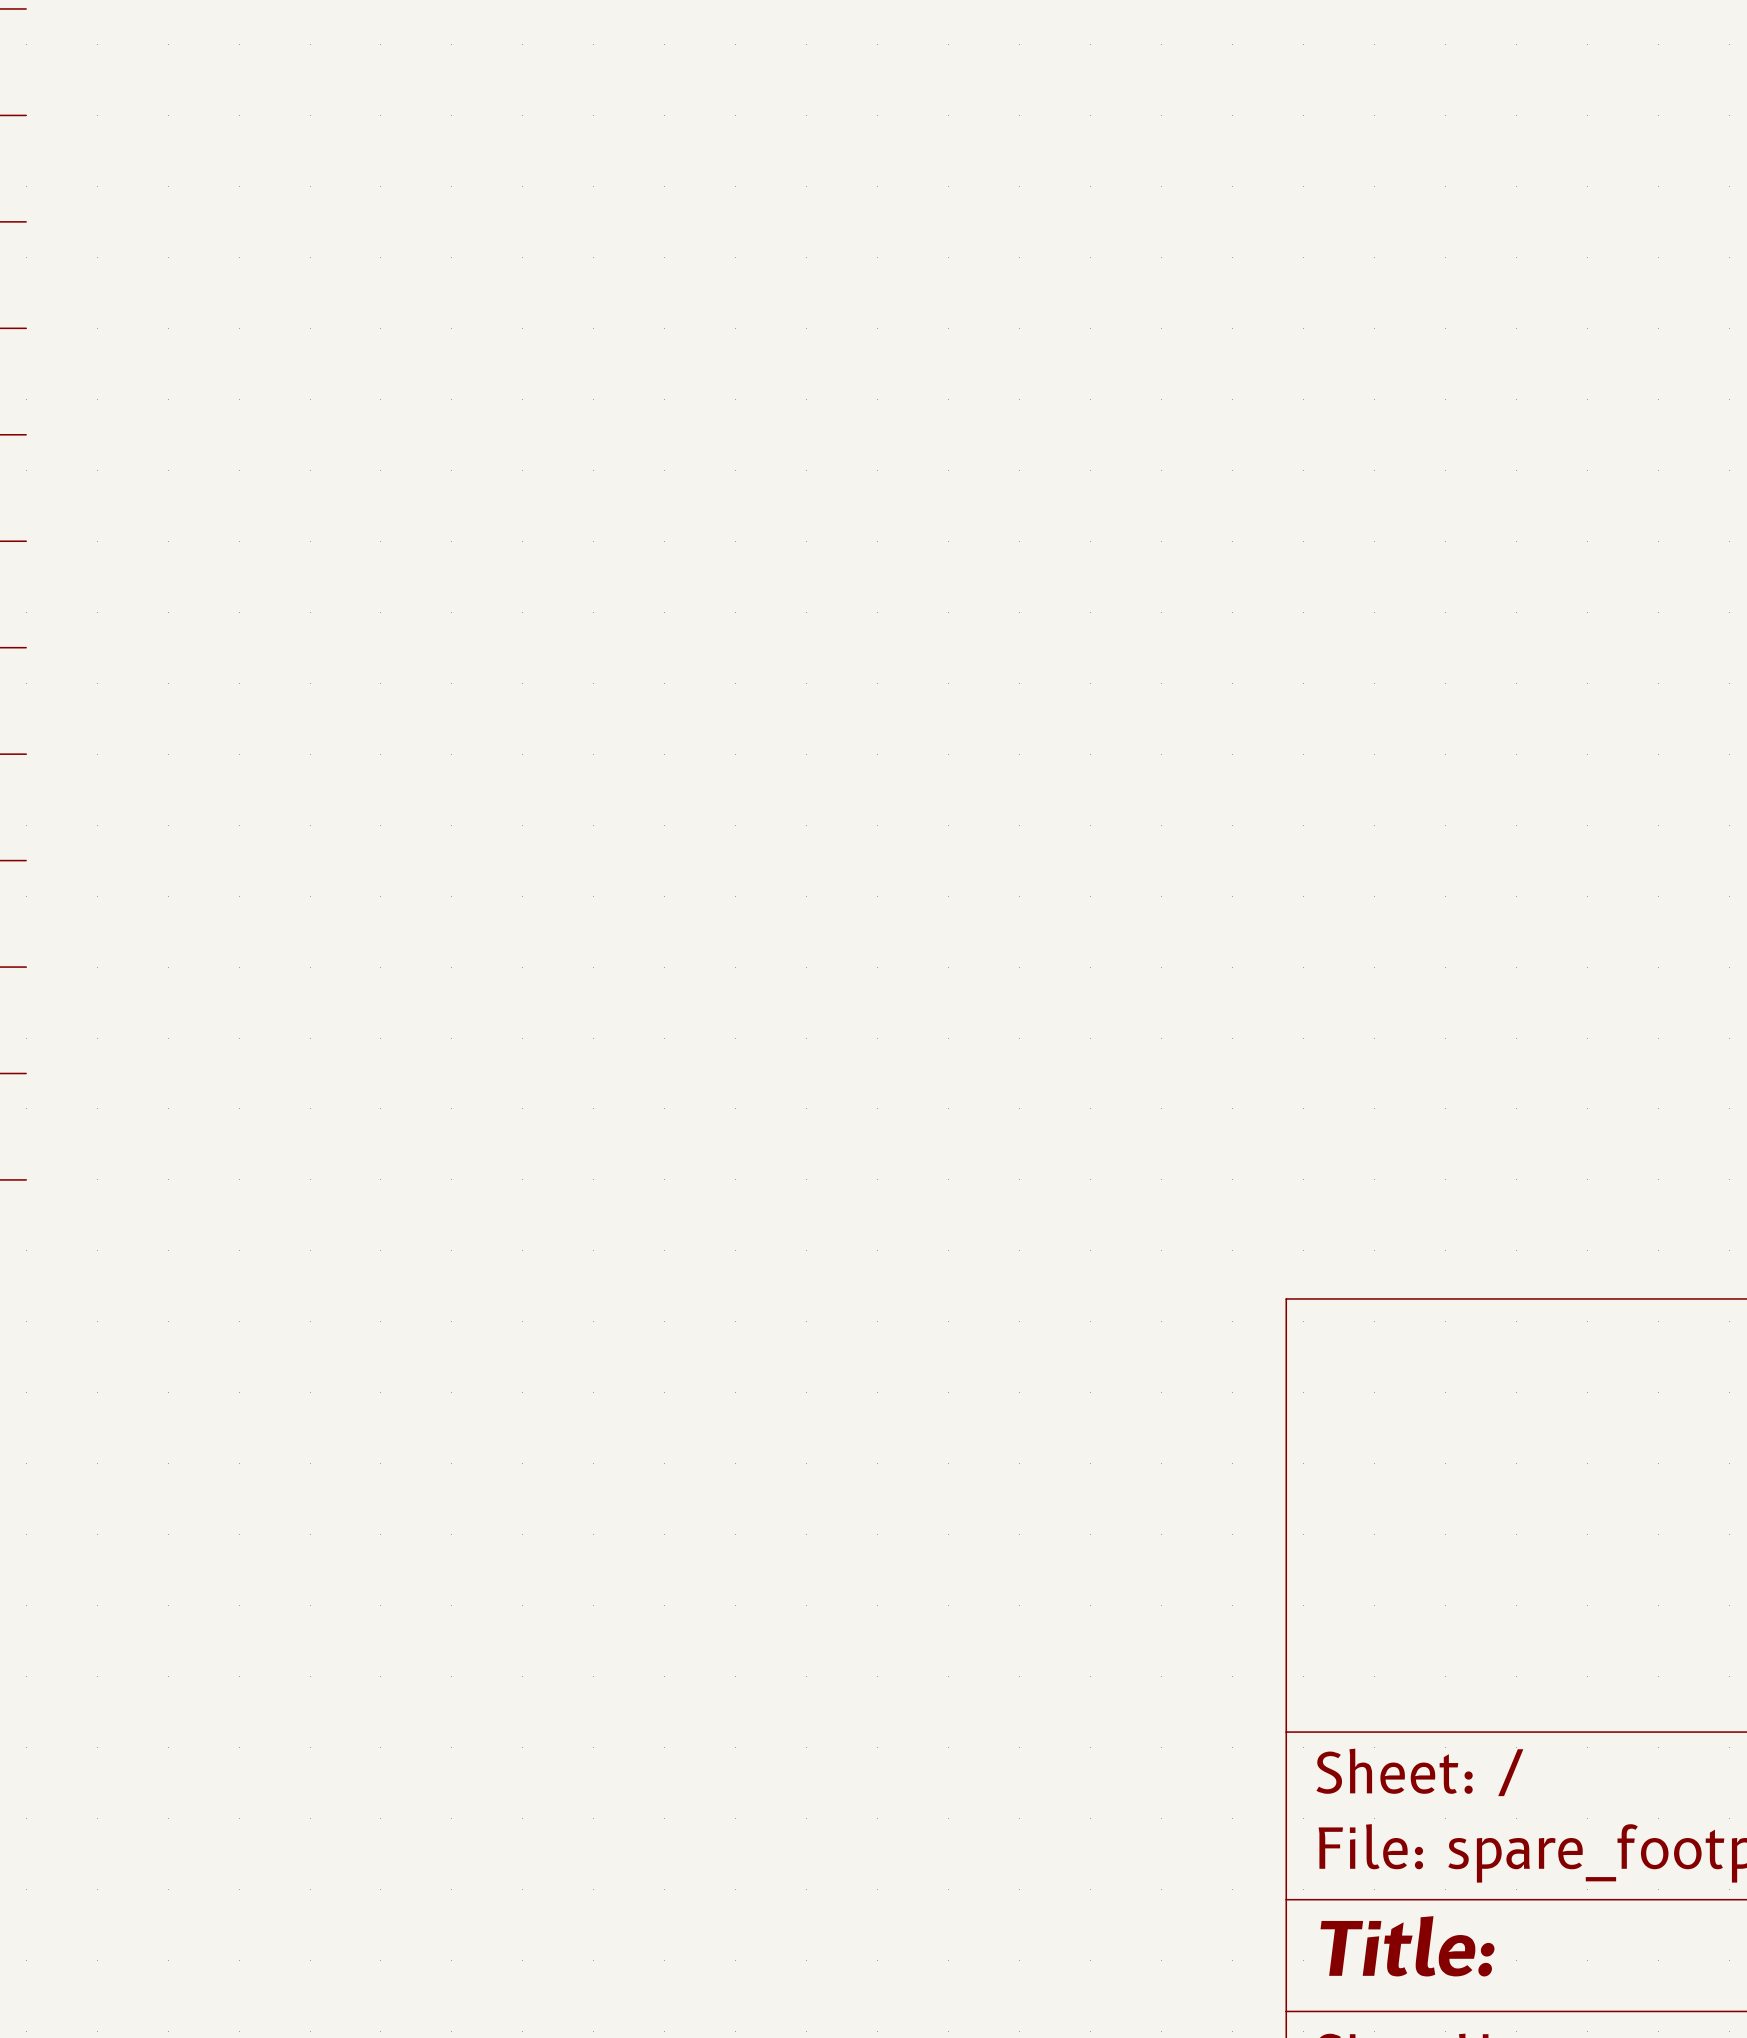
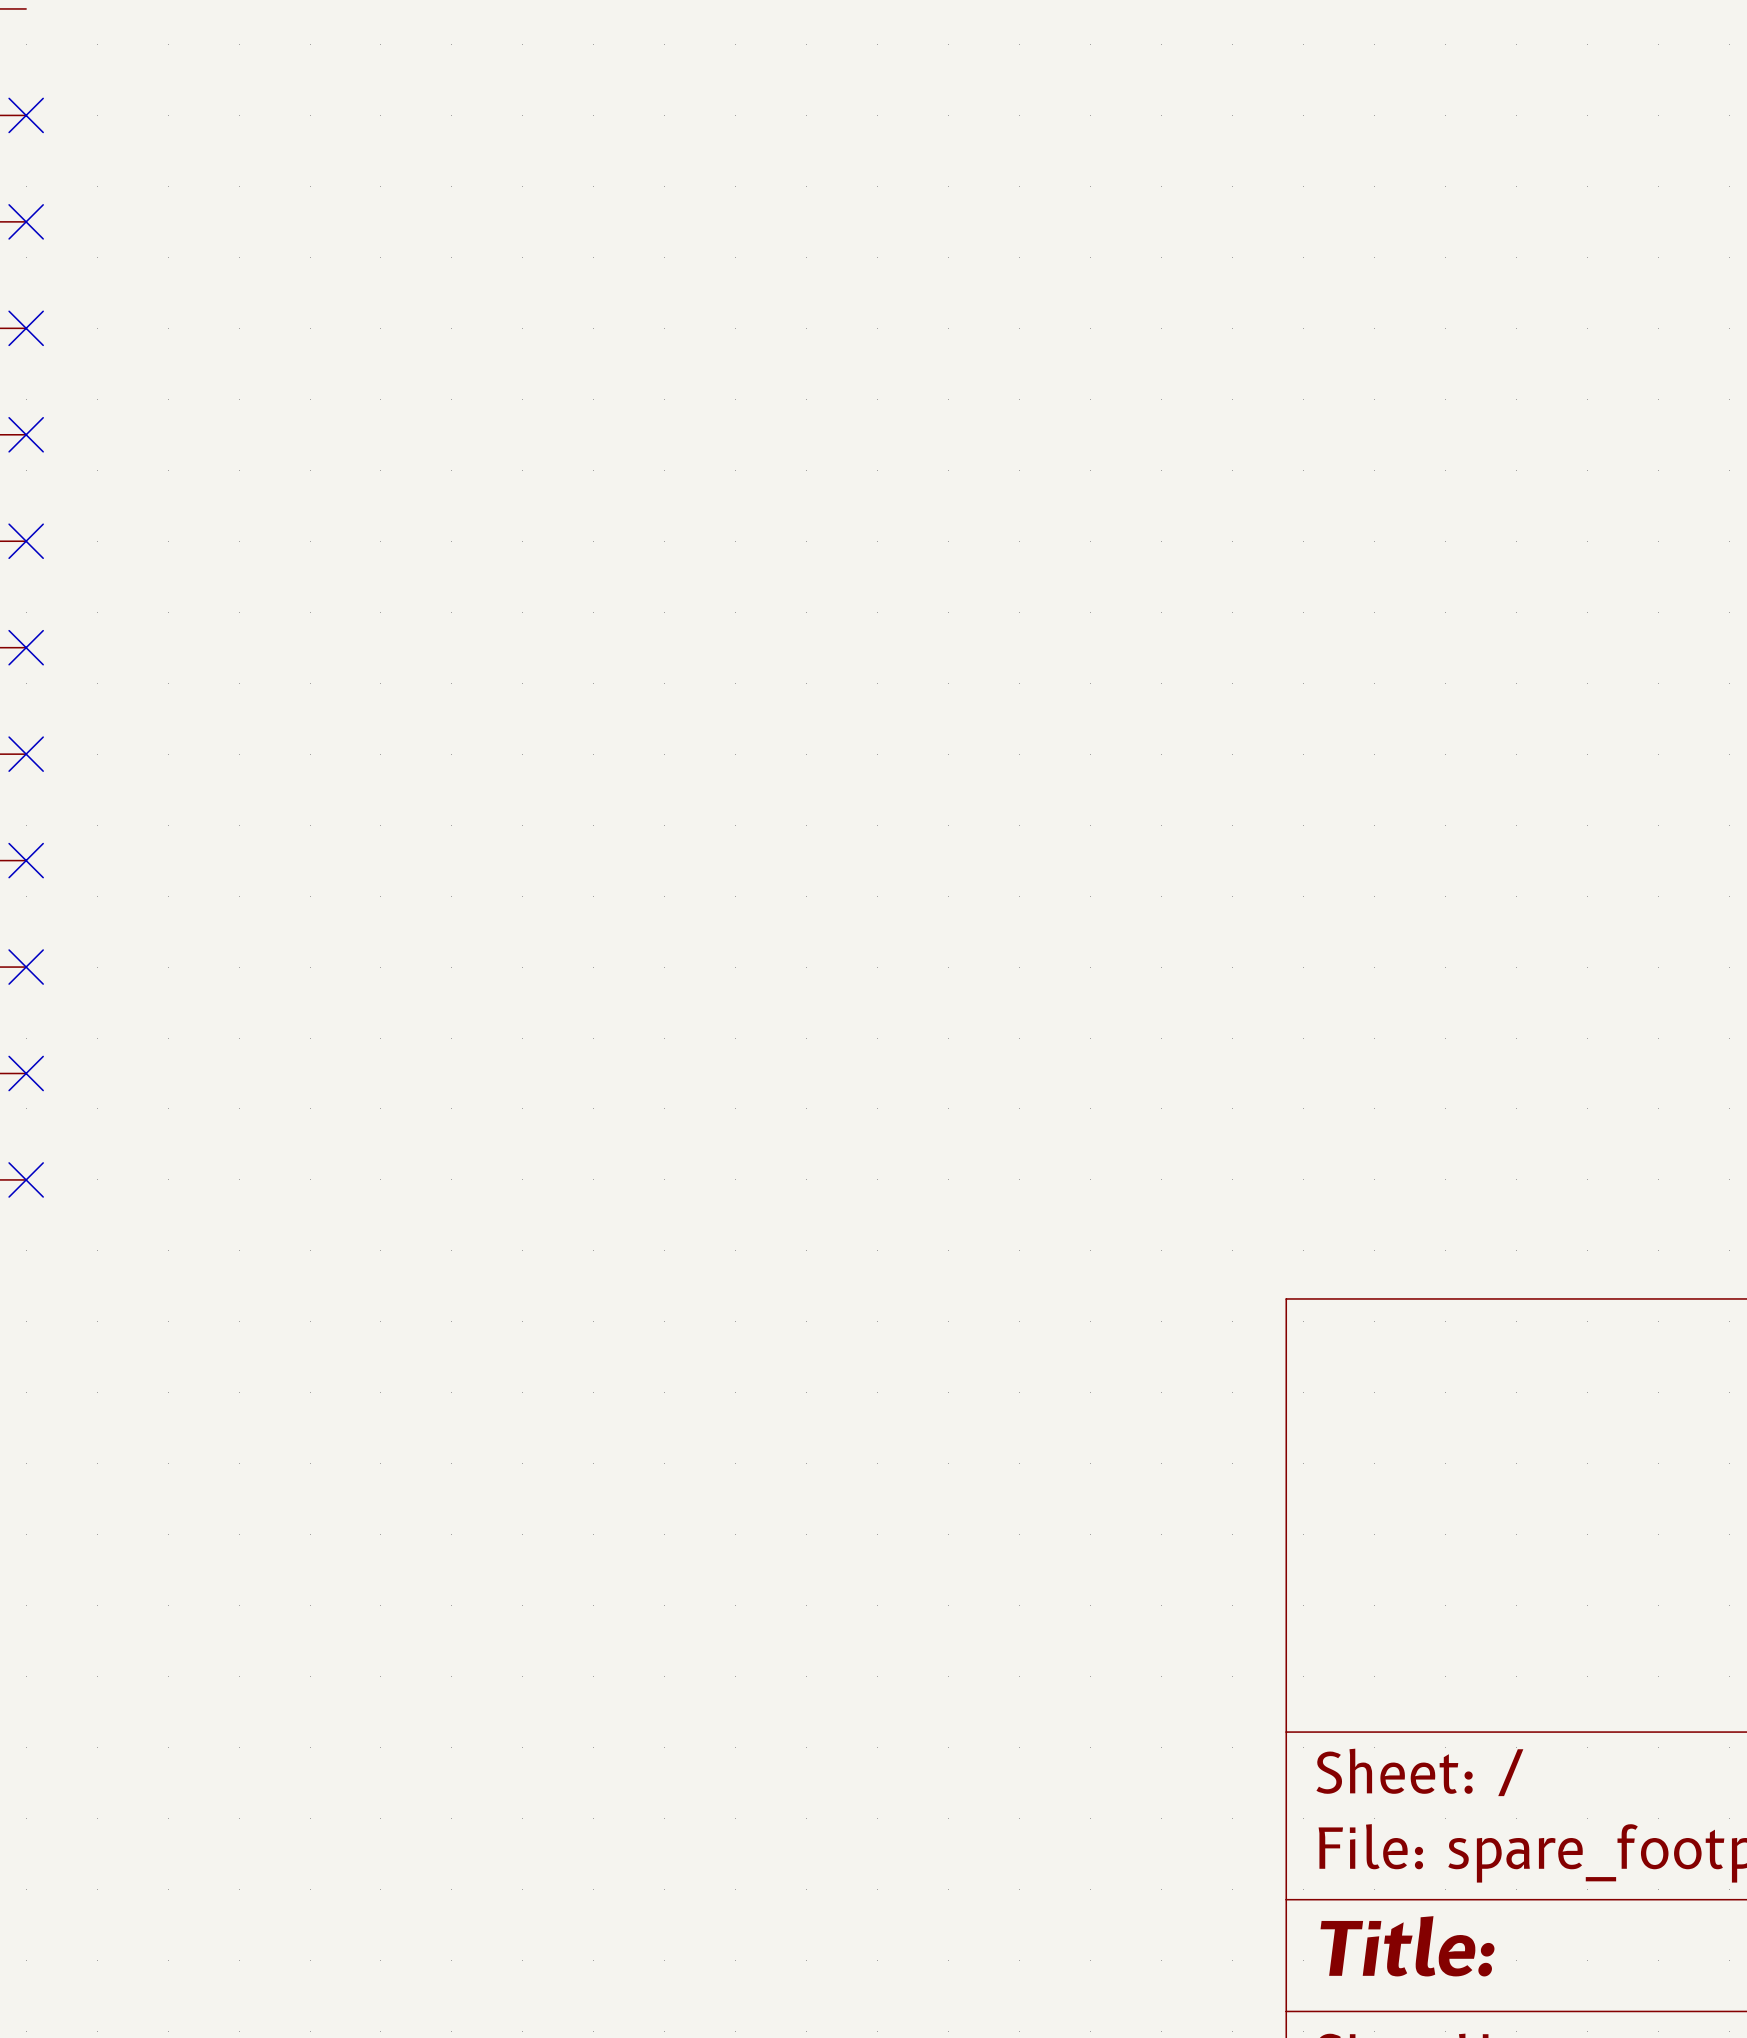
no-connect mark: none -> (26, 115)
no-connect mark: none -> (26, 221)
no-connect mark: none -> (26, 328)
no-connect mark: none -> (26, 434)
no-connect mark: none -> (26, 541)
no-connect mark: none -> (26, 647)
no-connect mark: none -> (26, 754)
no-connect mark: none -> (26, 860)
no-connect mark: none -> (26, 967)
no-connect mark: none -> (26, 1073)
no-connect mark: none -> (26, 1179)

